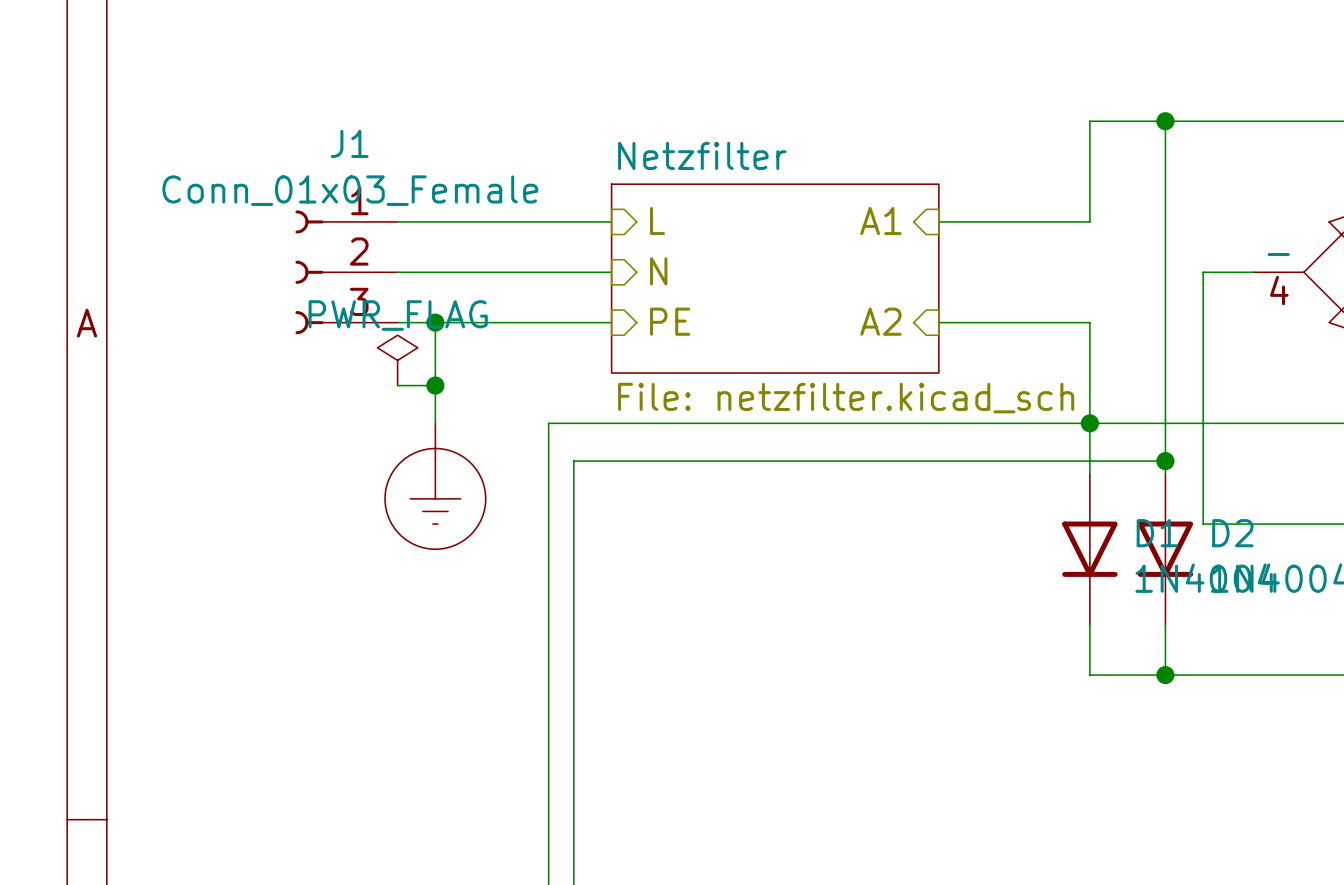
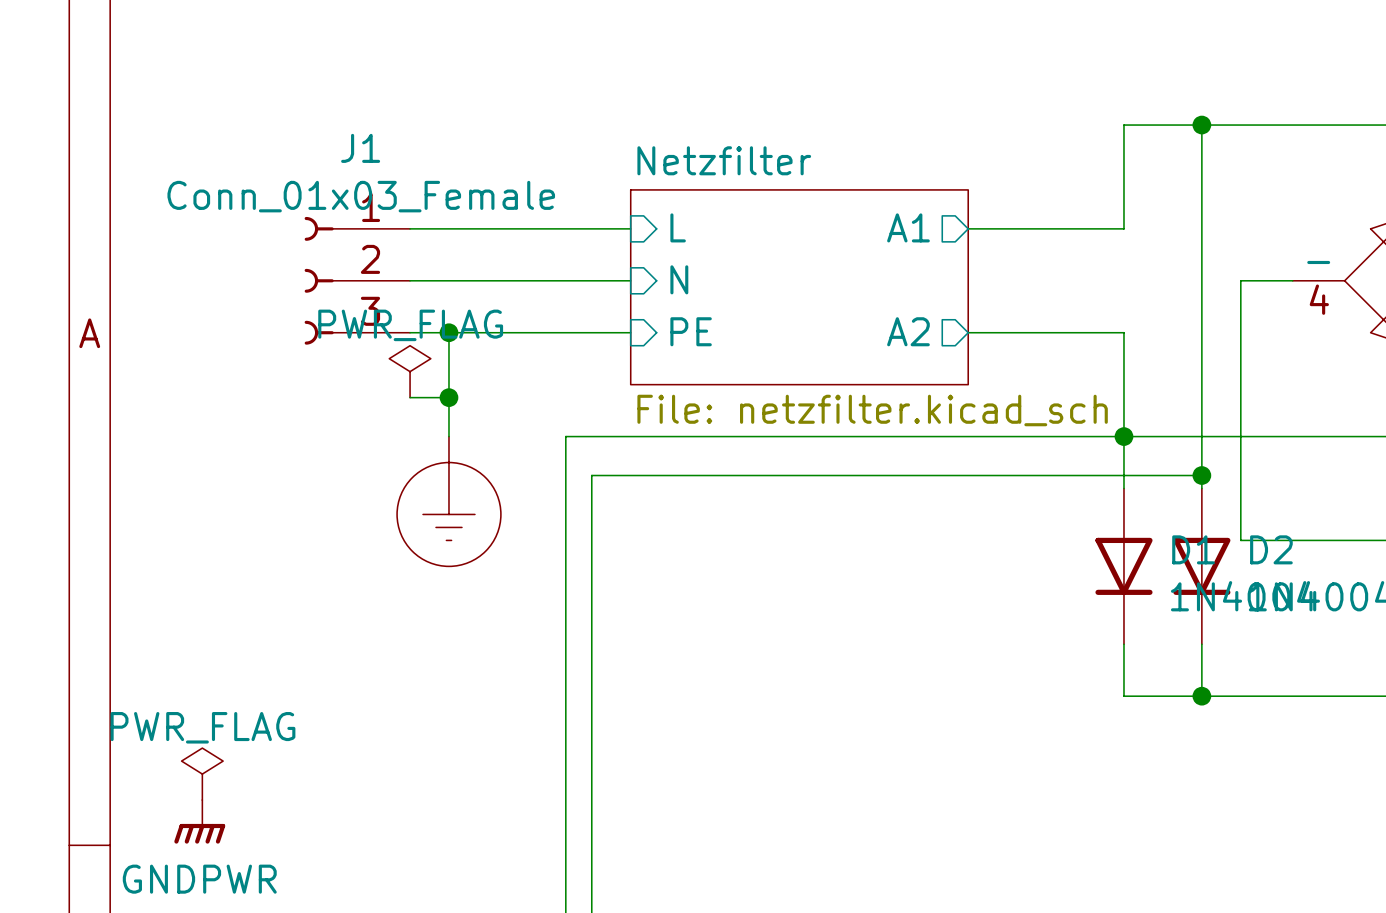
hierarchical label: L (657, 221) -> none
sheet pin: none -> L (678, 227)
hierarchical label: A1 (880, 221) -> none
sheet pin: none -> A1 (908, 227)
hierarchical label: N (658, 271) -> none
sheet pin: none -> N (679, 279)
hierarchical label: PE (670, 321) -> none
sheet pin: none -> PE (691, 331)
hierarchical label: A2 (880, 321) -> none
sheet pin: none -> A2 (908, 331)
power symbol: none -> PWR_FLAG (202, 774)
power symbol: none -> GNDPWR (199, 821)

